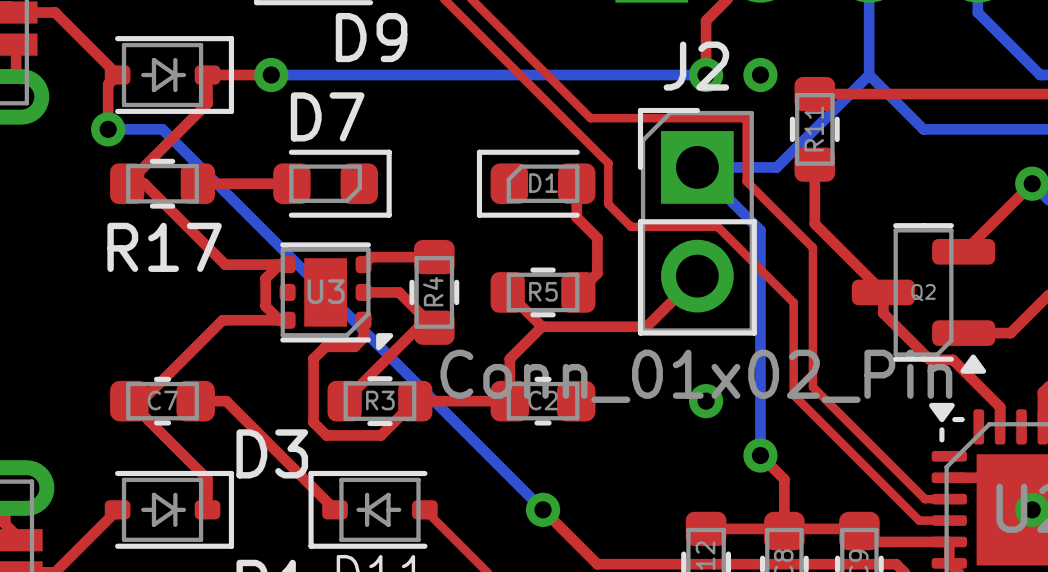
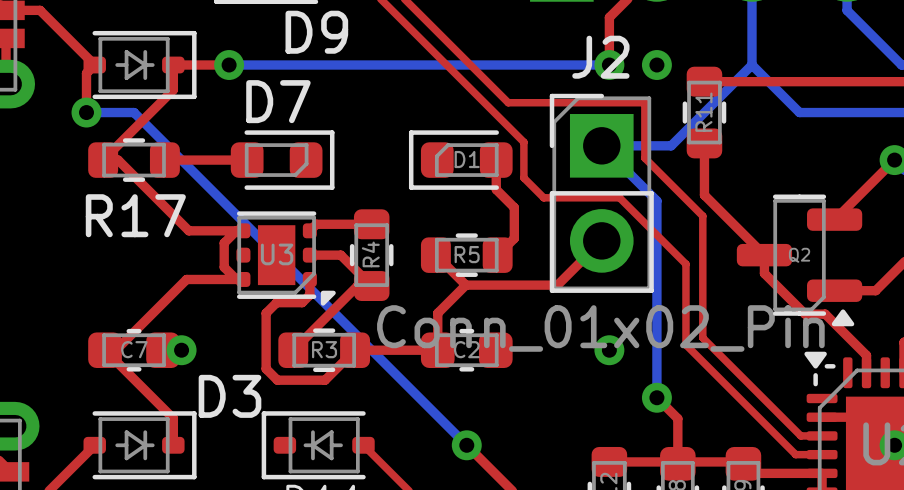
top track: (195, 401) (226, 401) (335, 509) -> none
via: none -> (181, 350)

